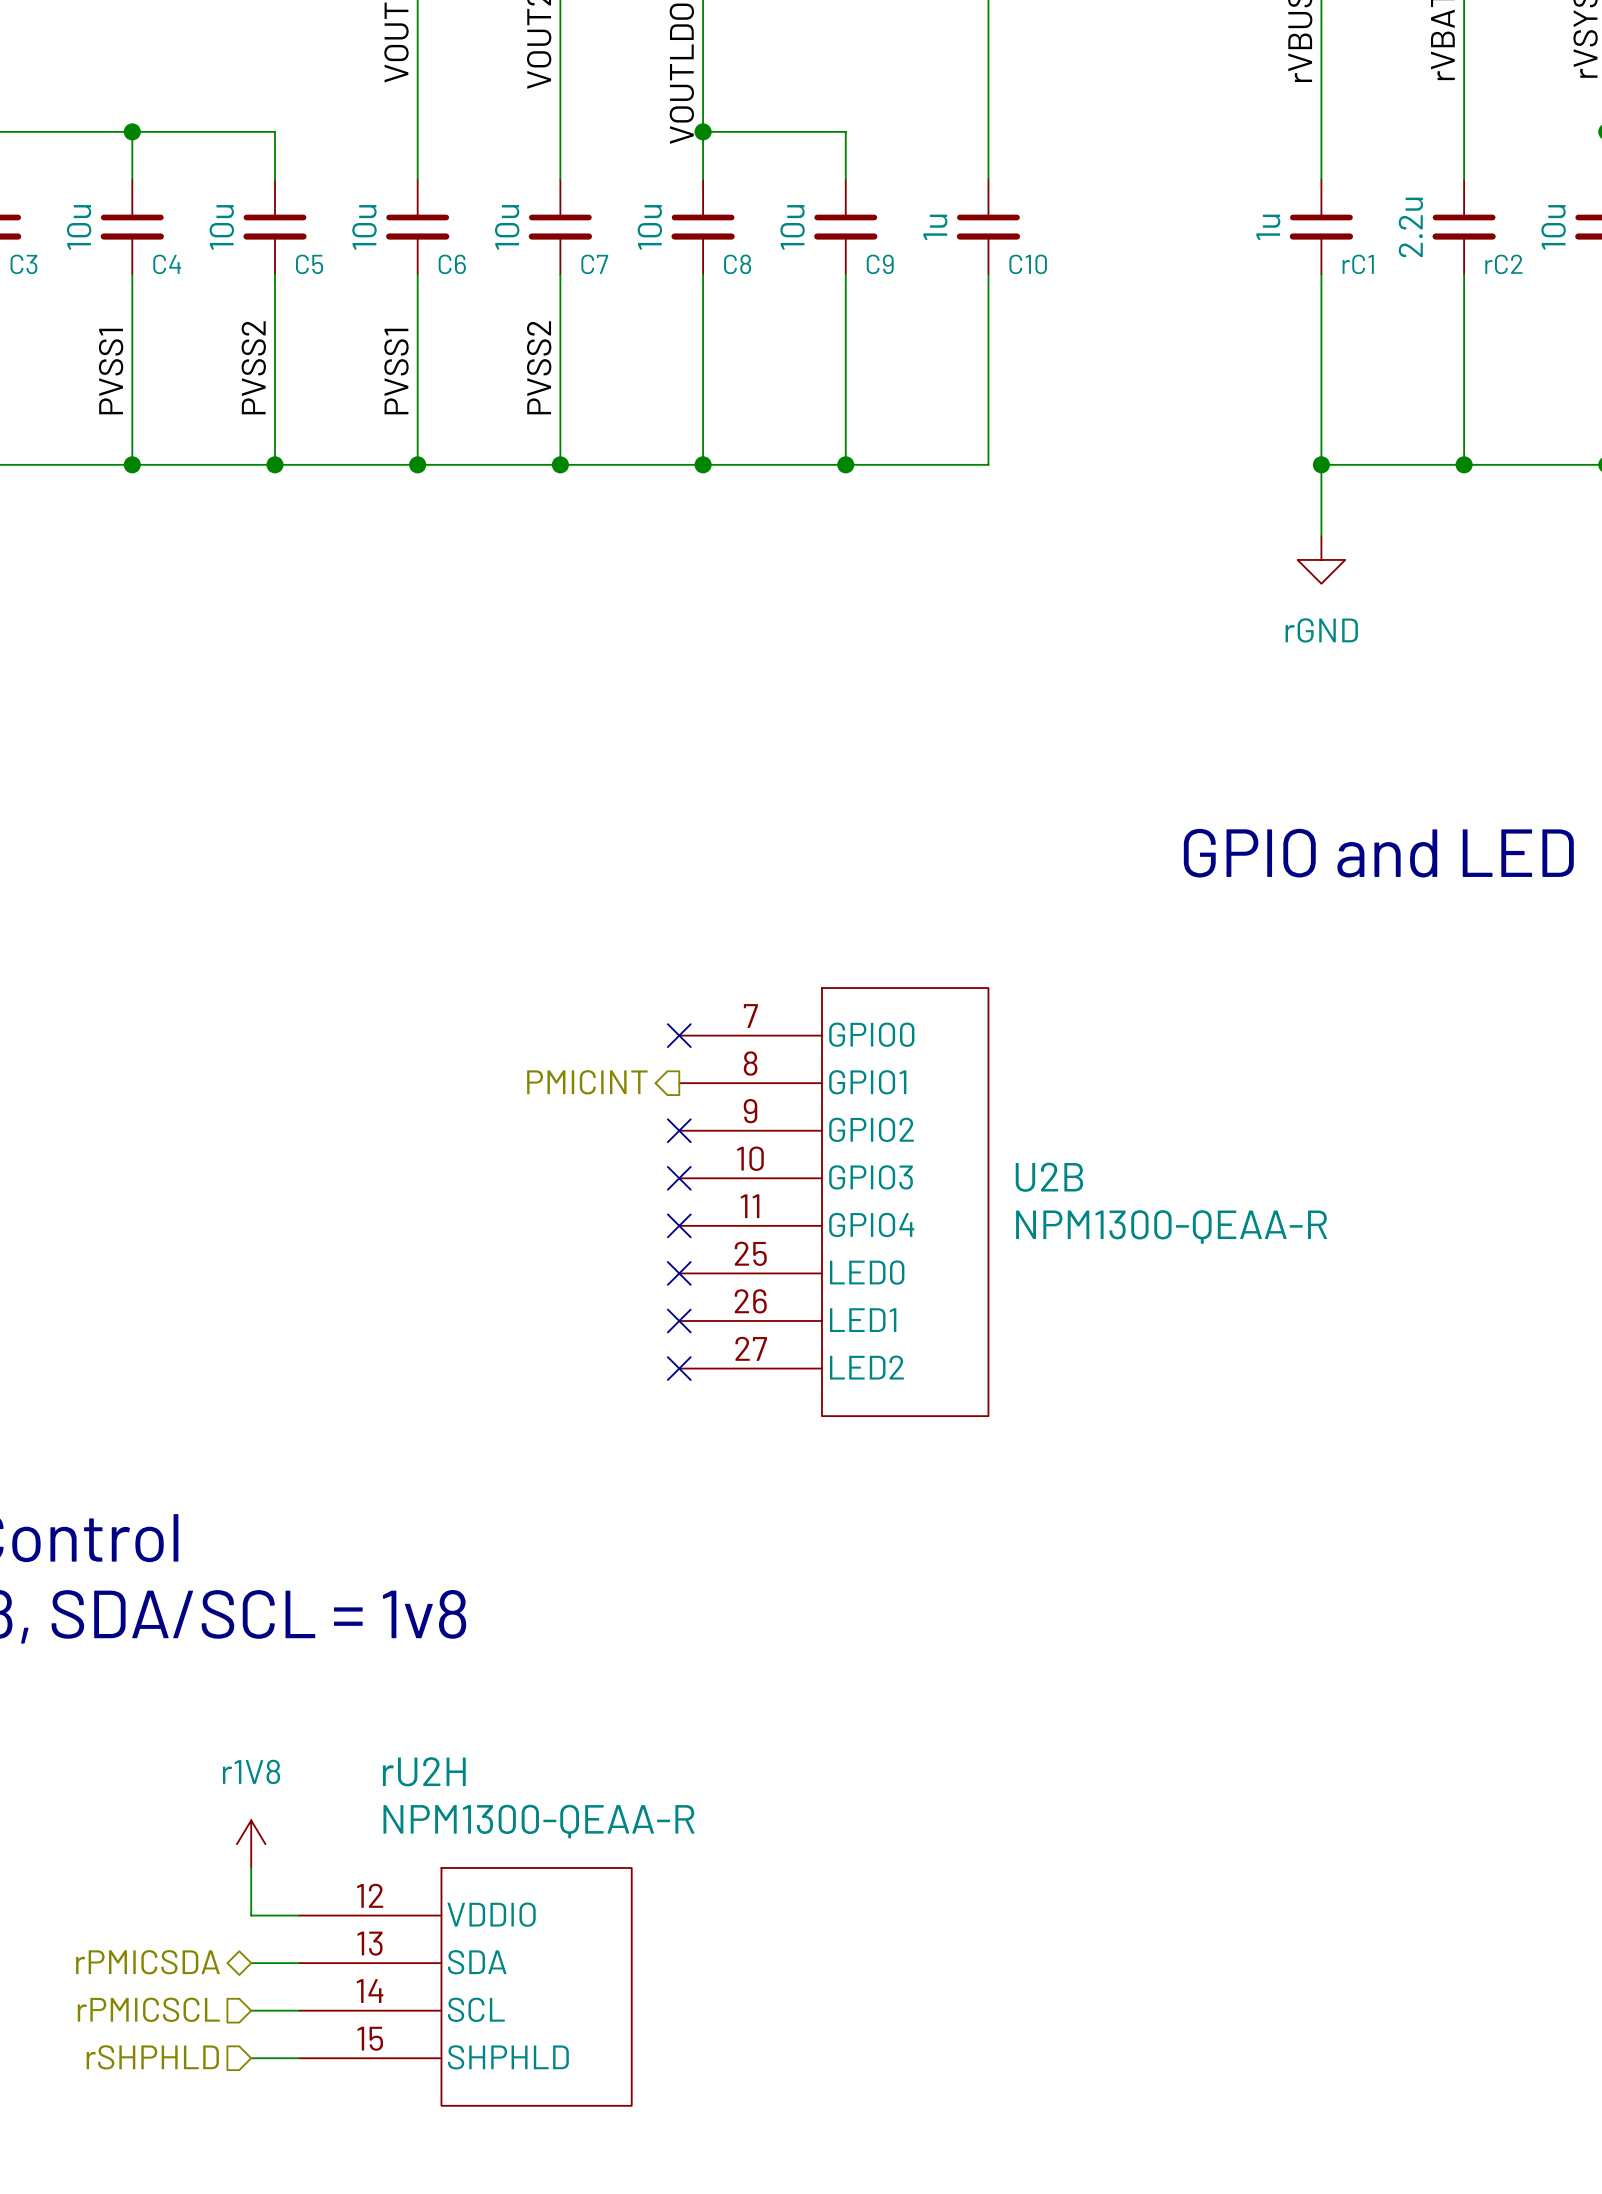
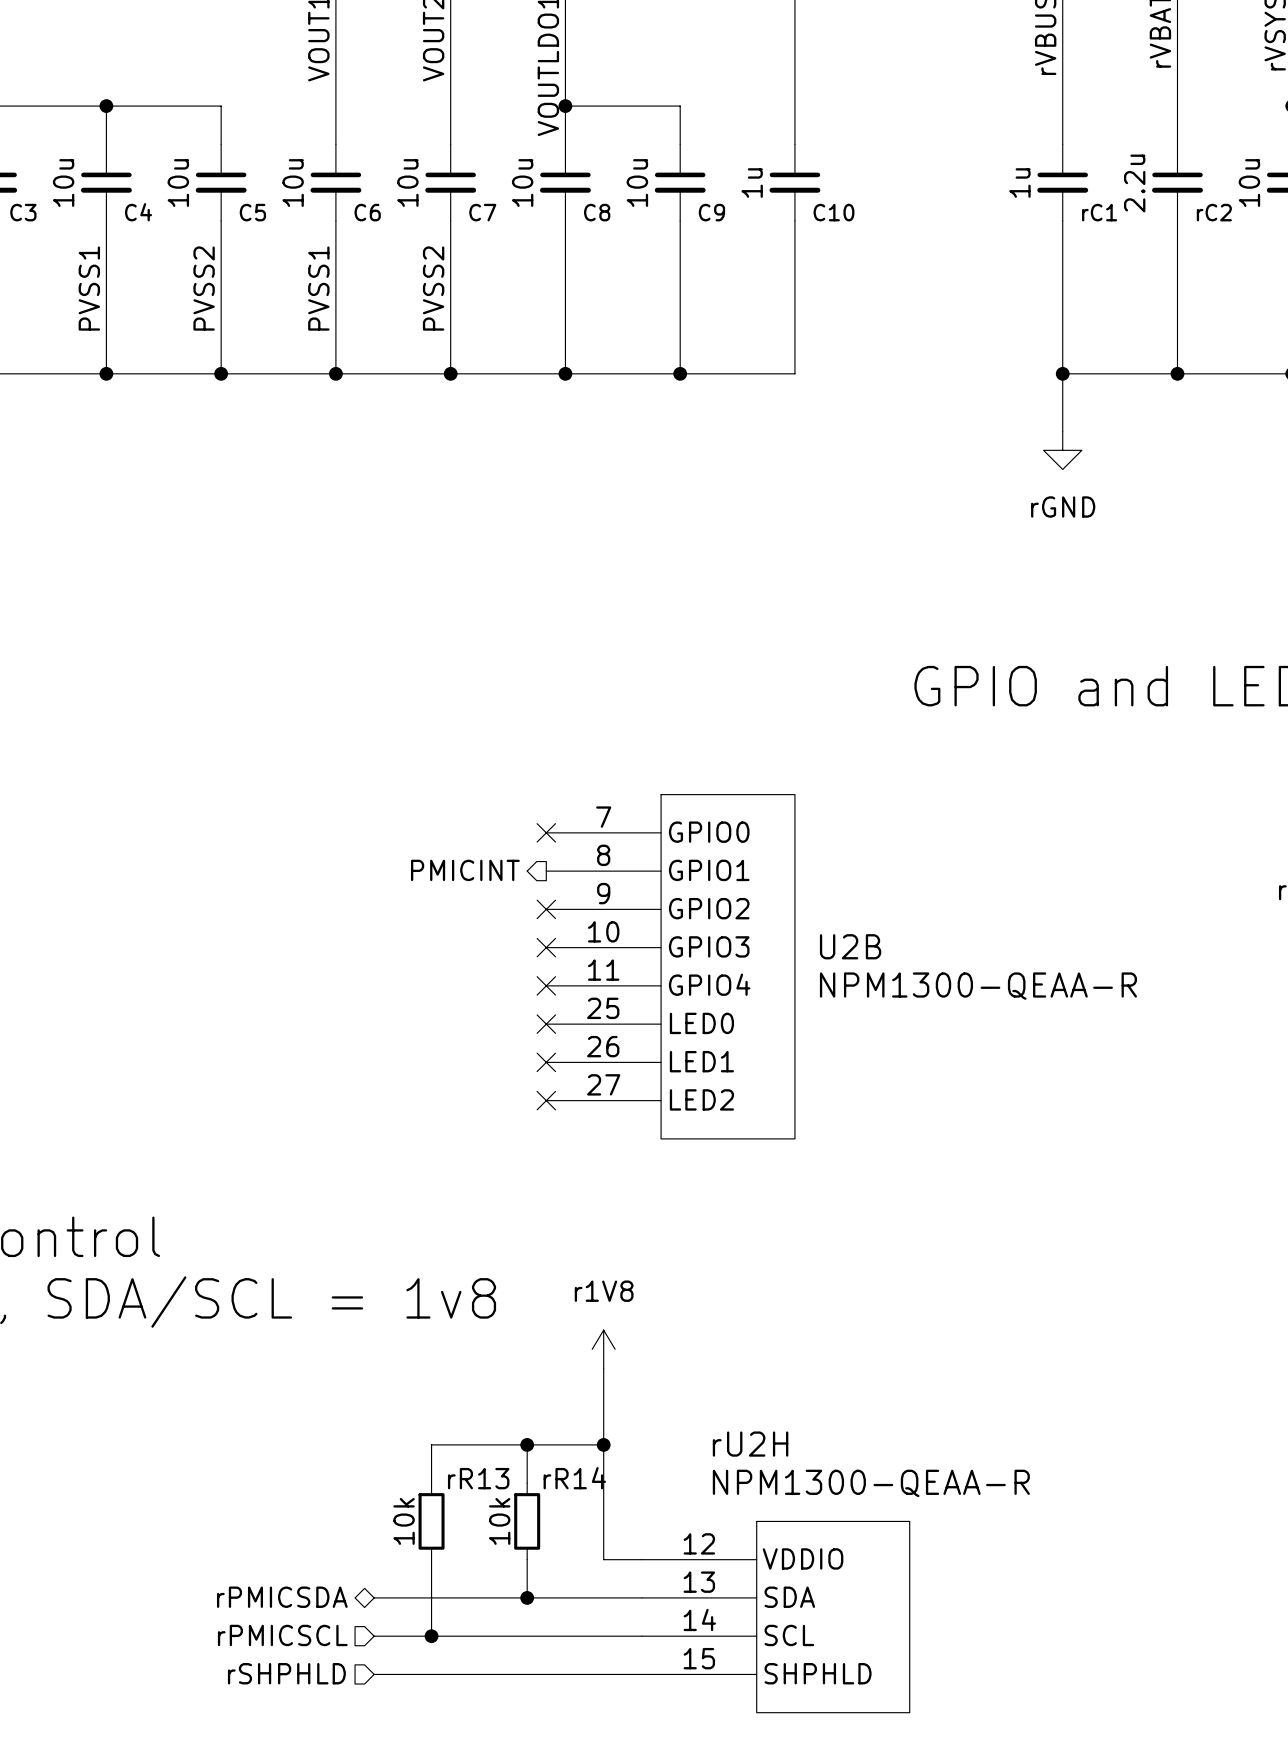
power symbol: none -> r1V8 (603, 1349)
wire: none -> (603, 1368) (603, 1559) (641, 1559)
wire: none -> (527, 1444) (527, 1483)
junction: none -> (527, 1444)
wire: none -> (603, 1444) (431, 1444) (431, 1483)
junction: none -> (603, 1444)
power symbol: r1V8 (251, 1844) -> none
wire: (251, 1867) (251, 1915) (298, 1915) -> none
rR13: none -> 10k (431, 1521)
rR14: none -> 10k (527, 1521)
wire: none -> (431, 1559) (431, 1636)
wire: none -> (527, 1559) (527, 1597)
hierarchical label position: rPMICSDA (147, 1962) -> rPMICSDA (282, 1597)
wire: (251, 1963) (298, 1963) -> none
wire: none -> (374, 1597) (641, 1597)
rU2H position: (465, 1986) -> (775, 1617)
junction: none -> (527, 1597)
hierarchical label position: rPMICSCL (148, 2009) -> rPMICSCL (282, 1635)
wire: (251, 2010) (298, 2010) -> none
wire: none -> (374, 1636) (641, 1636)
junction: none -> (431, 1636)
hierarchical label position: rSHPHLD (152, 2057) -> rSHPHLD (286, 1673)
wire: (251, 2058) (298, 2058) -> none
wire: none -> (374, 1674) (641, 1674)

